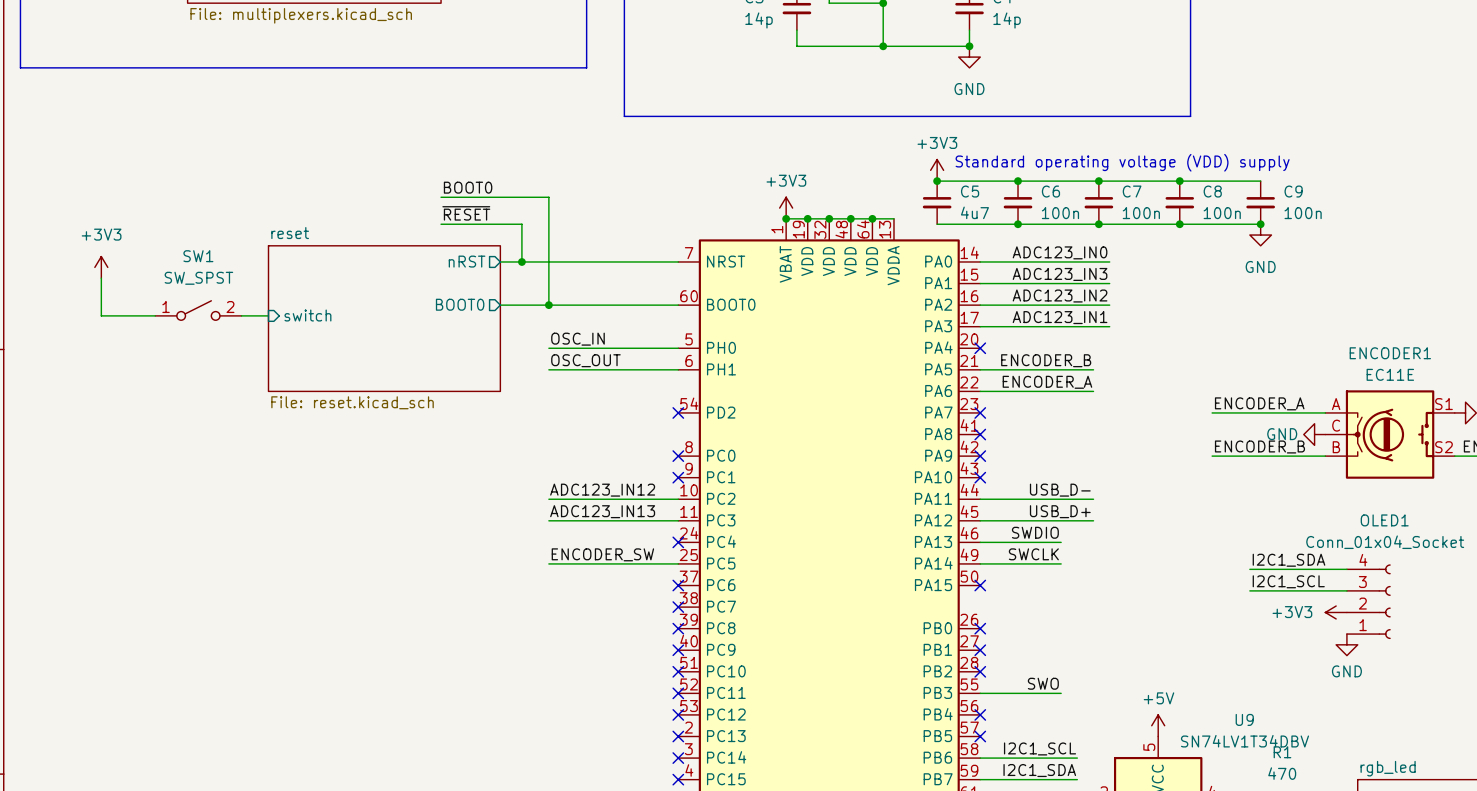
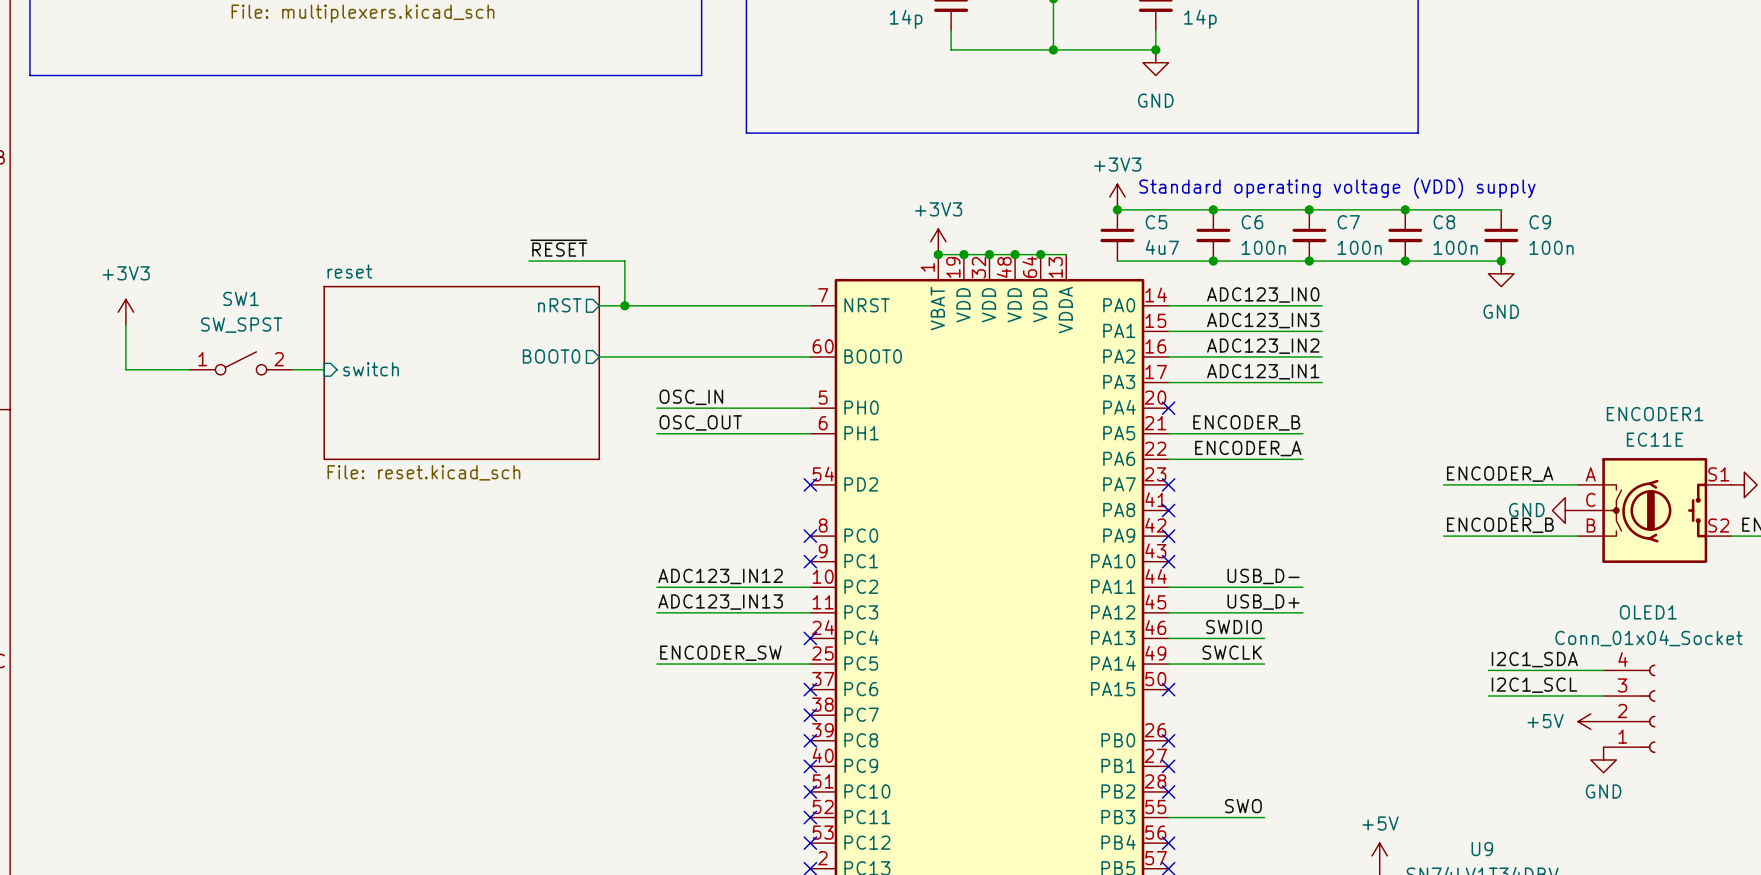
label: BOOT0 (468, 187) -> none
wire: (441, 197) (548, 197) (548, 305) -> none
junction: (548, 305) -> none
power symbol: +3V3 (1336, 612) -> +5V (1590, 721)

